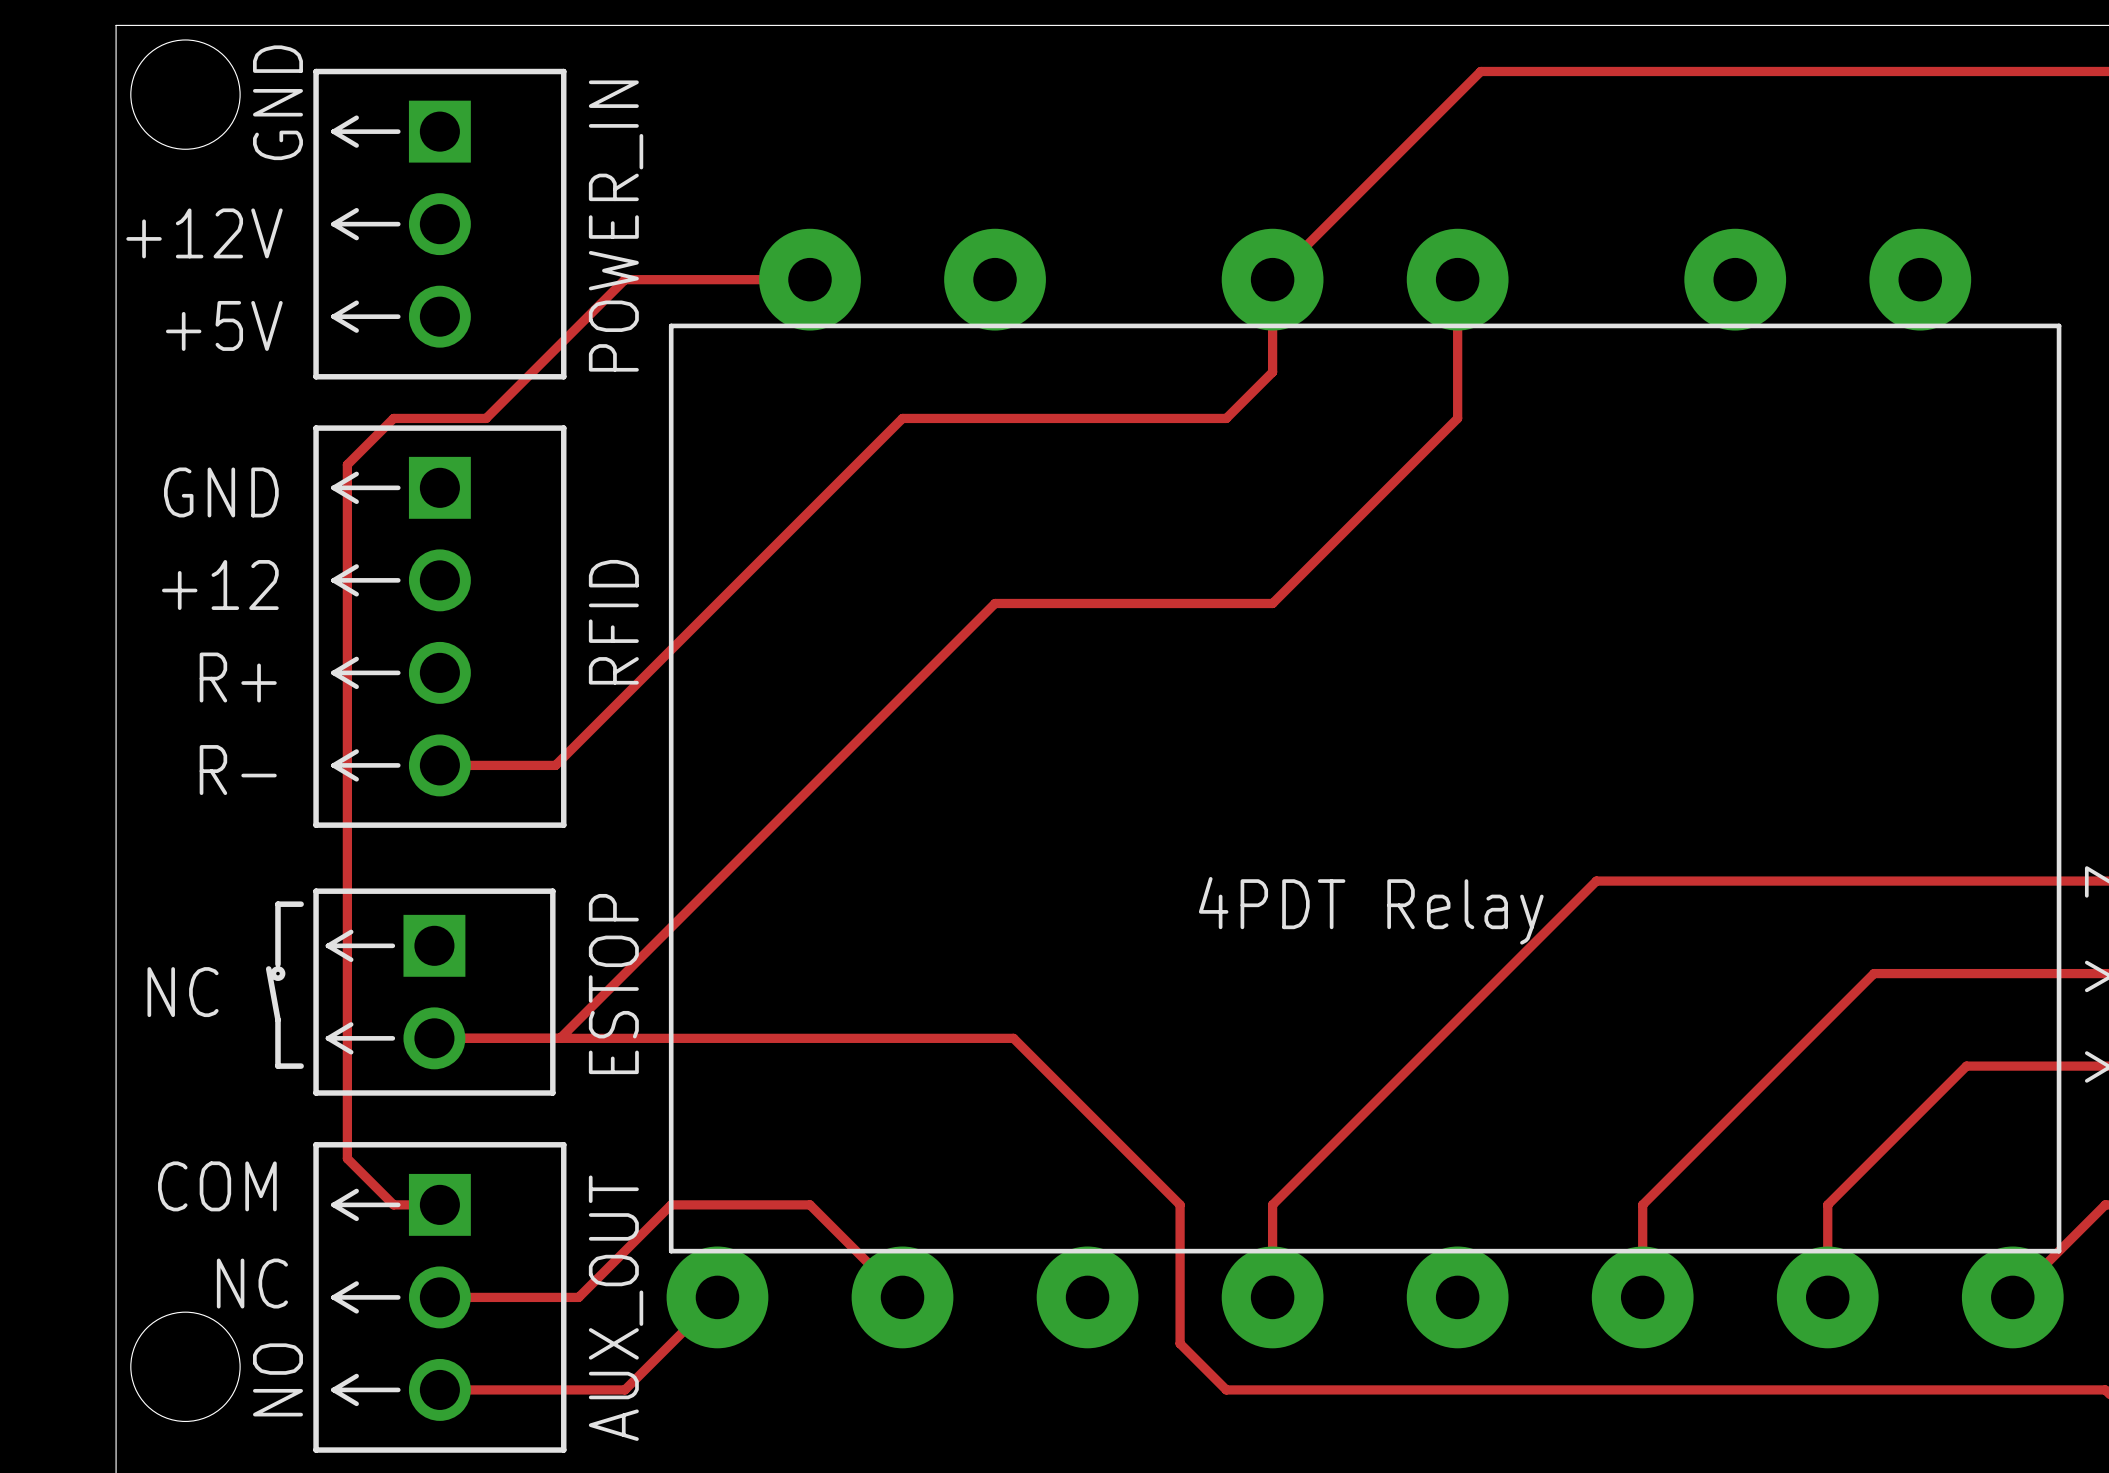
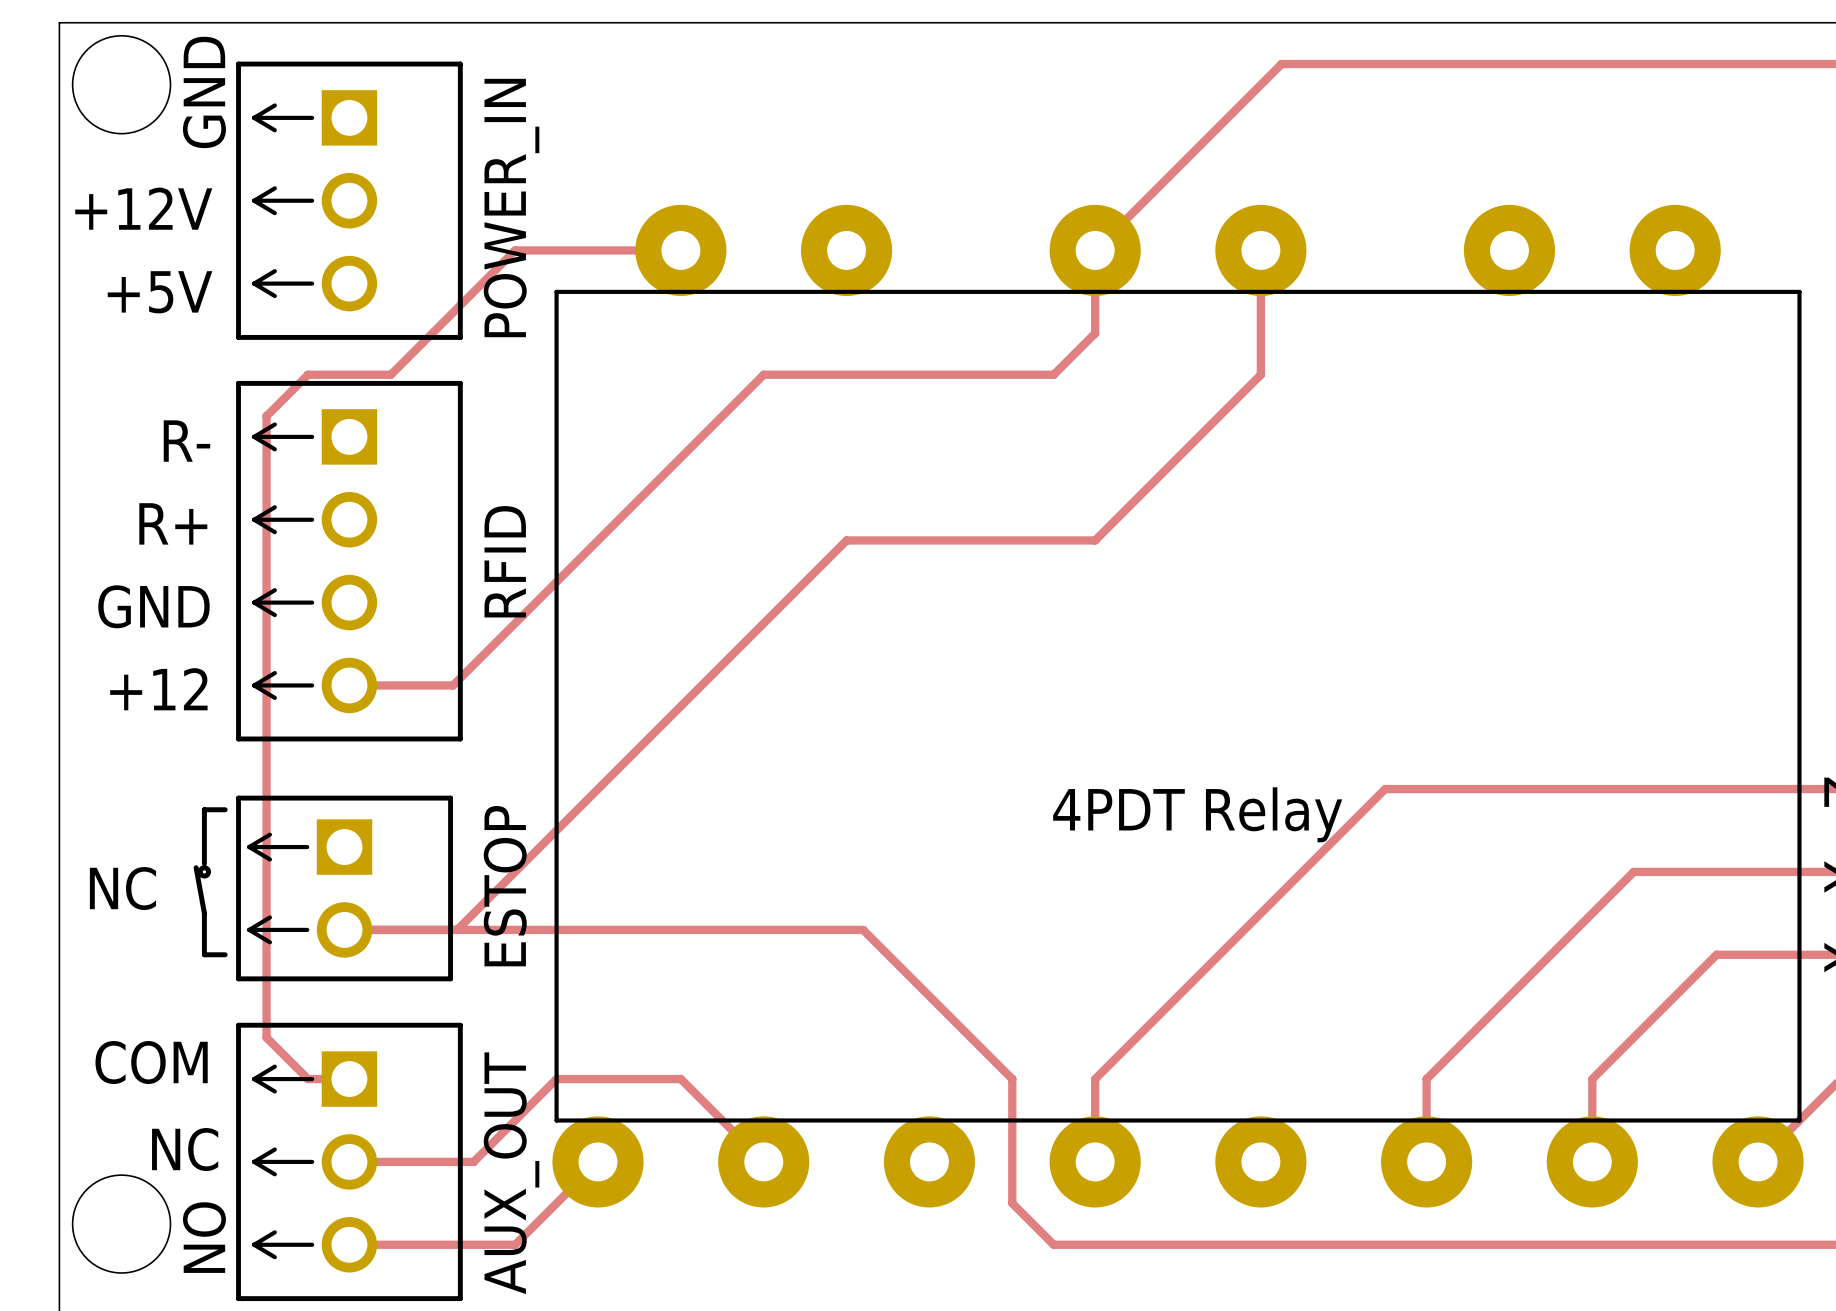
text: GND (221, 492) -> R- (186, 441)
text: +12 (220, 584) -> R+ (173, 523)
text: R+ (238, 677) -> GND (153, 606)
text: R- (238, 770) -> +12 (158, 689)

